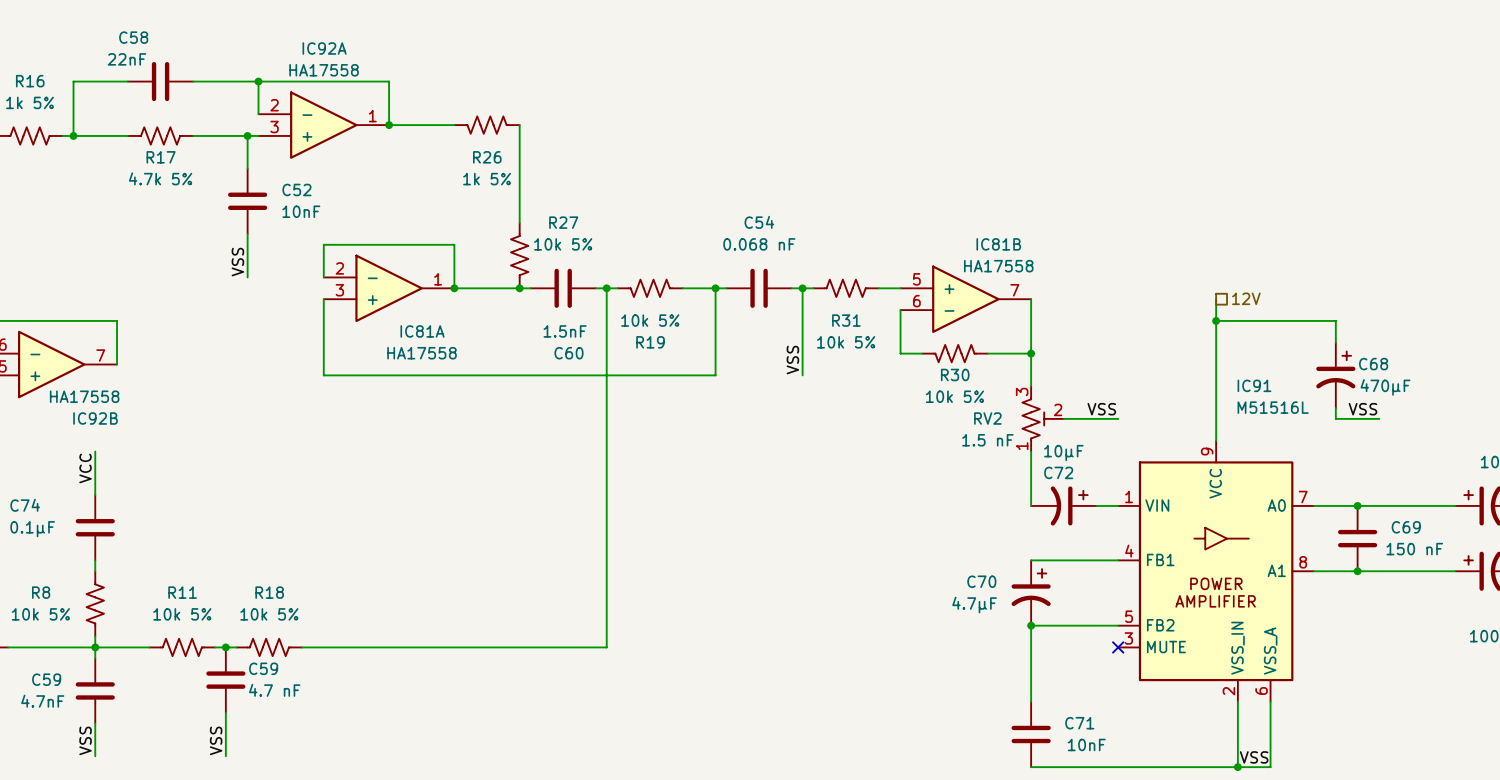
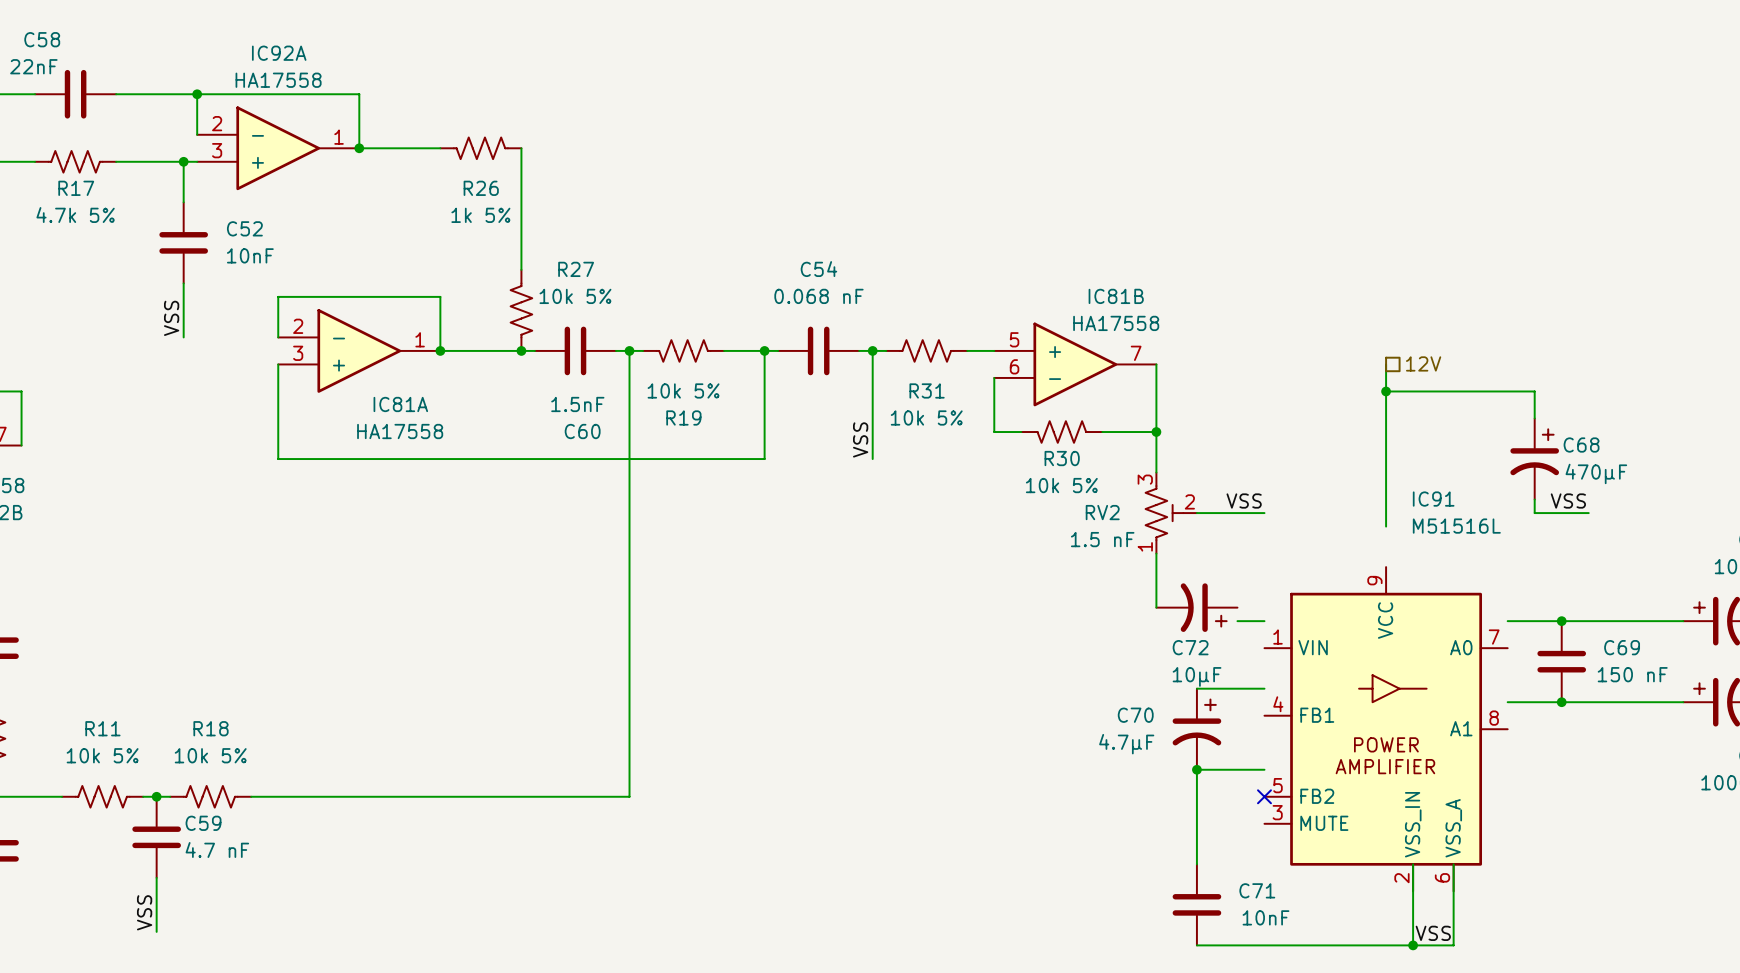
wire: (1216, 429) (1216, 440) -> none
wire: (1031, 495) (1031, 505) -> none
C72 flip: as is (1069, 505) -> up-down (1203, 607)
wire: (1031, 560) (1063, 560) -> none
IC91 position: (1216, 571) -> (1386, 729)
C70 position: (1031, 593) -> (1196, 729)
junction position: (1031, 625) -> (1196, 769)
wire: (1063, 625) (1031, 625) (1031, 701) -> (1196, 769) (1196, 864)
C71 position: (1031, 734) -> (1196, 904)
wire: (1031, 767) (1063, 767) -> none

